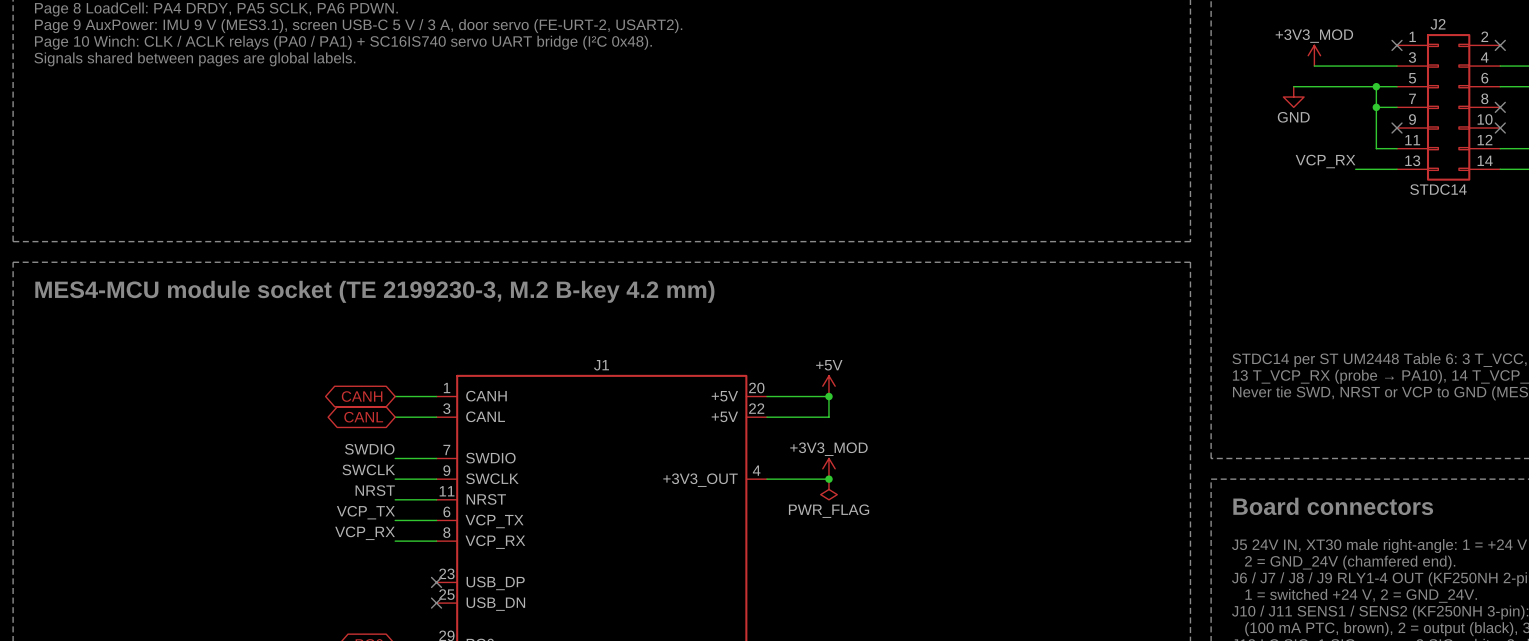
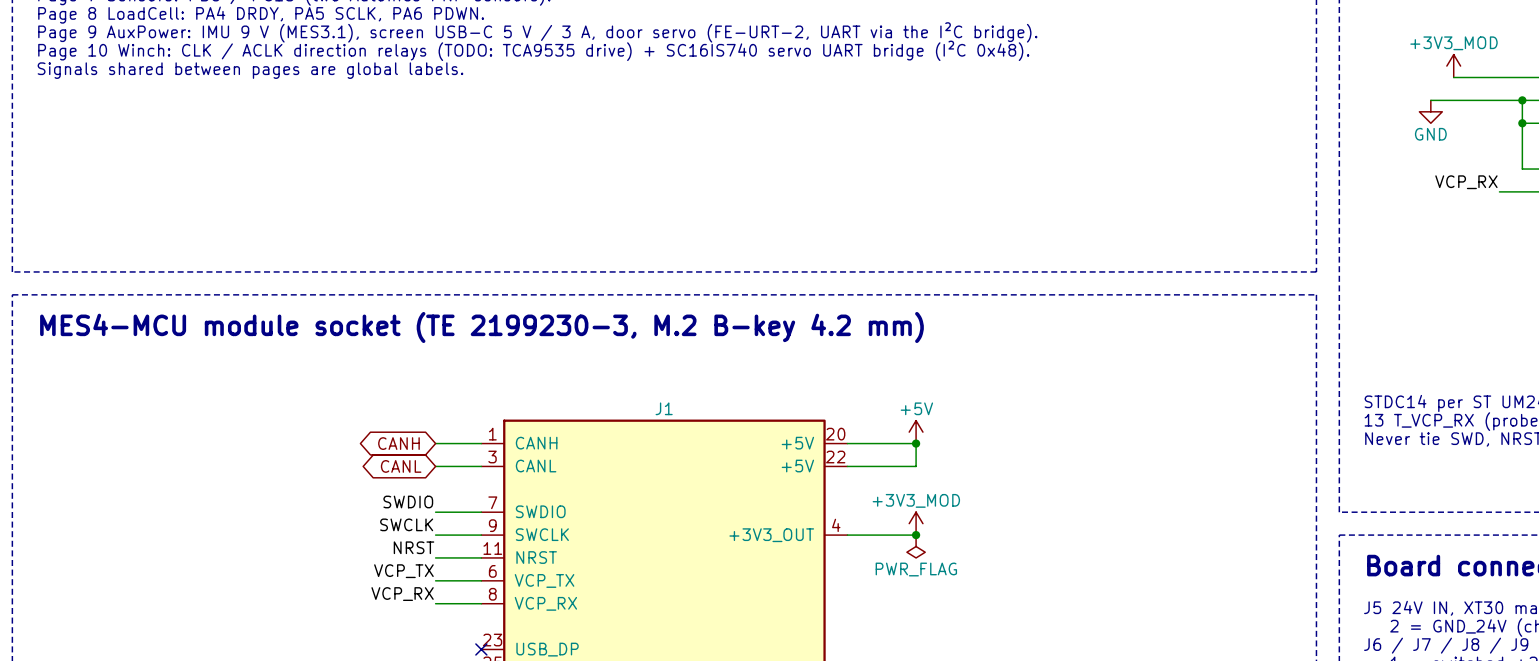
text: Page 9 AuxPower: IMU 9 V (MES3.1), screen USB-C 5 V / 3 A, door servo (FE-URT-2, USART2). (358, 26) -> Page 9 AuxPower: IMU 9 V (MES3.1), screen USB-C 5 V / 3 A, door servo (FE-URT-2, UART via the I²C bridge). (537, 32)
text: Page 10 Winch: CLK / ACLK relays (PA0 / PA1) + SC16IS740 servo UART bridge (I²C 0x48). (343, 42) -> Page 10 Winch: CLK / ACLK direction relays (TODO: TCA9535 drive) + SC16IS740 servo UART bridge (I²C 0x48). (533, 50)

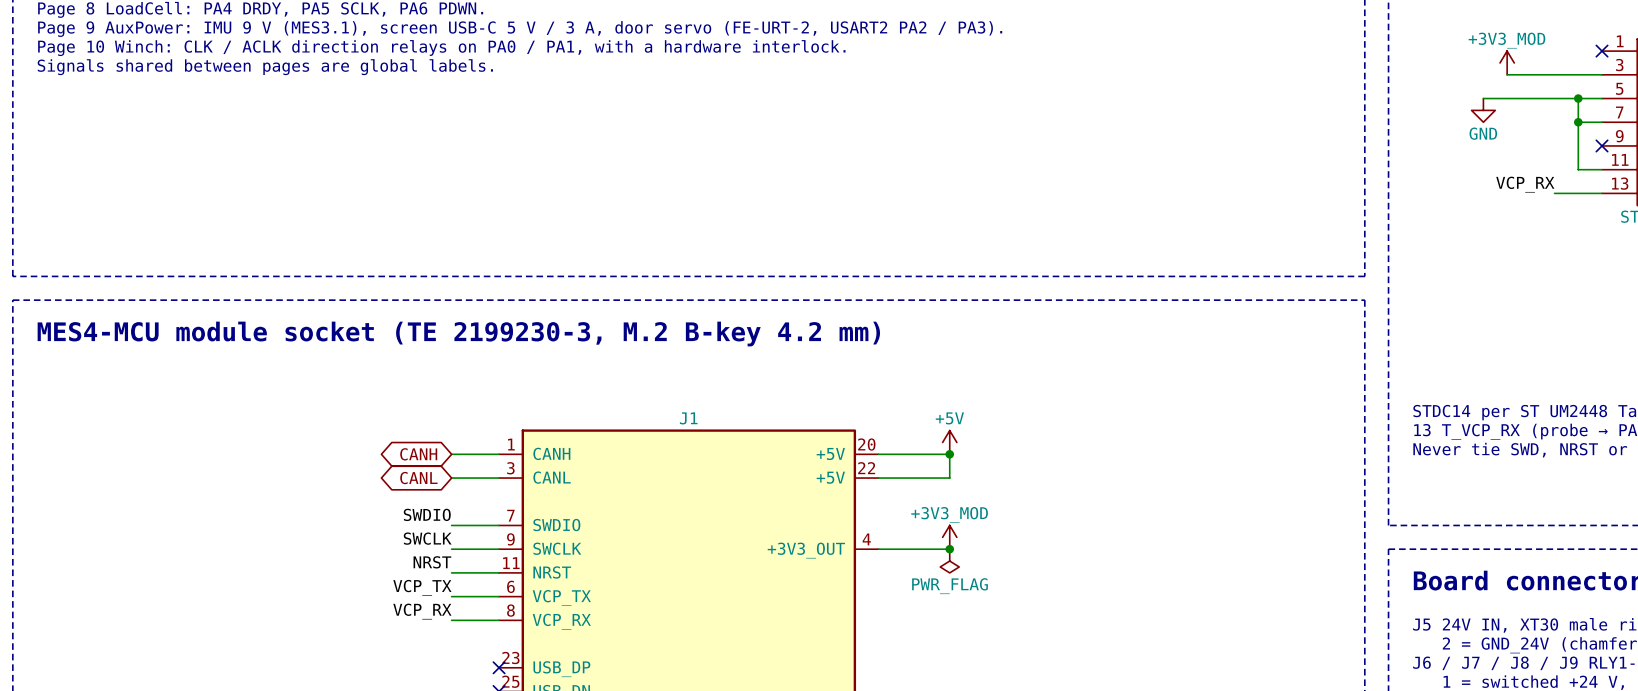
text: Page 9 AuxPower: IMU 9 V (MES3.1), screen USB-C 5 V / 3 A, door servo (FE-URT-2, UART via the I²C bridge). (537, 32) -> Page 9 AuxPower: IMU 9 V (MES3.1), screen USB-C 5 V / 3 A, door servo (FE-URT-2, USART2 PA2 / PA3). (520, 29)
text: Page 10 Winch: CLK / ACLK direction relays (TODO: TCA9535 drive) + SC16IS740 servo UART bridge (I²C 0x48). (533, 50) -> Page 10 Winch: CLK / ACLK direction relays on PA0 / PA1, with a hardware interlock. (441, 48)

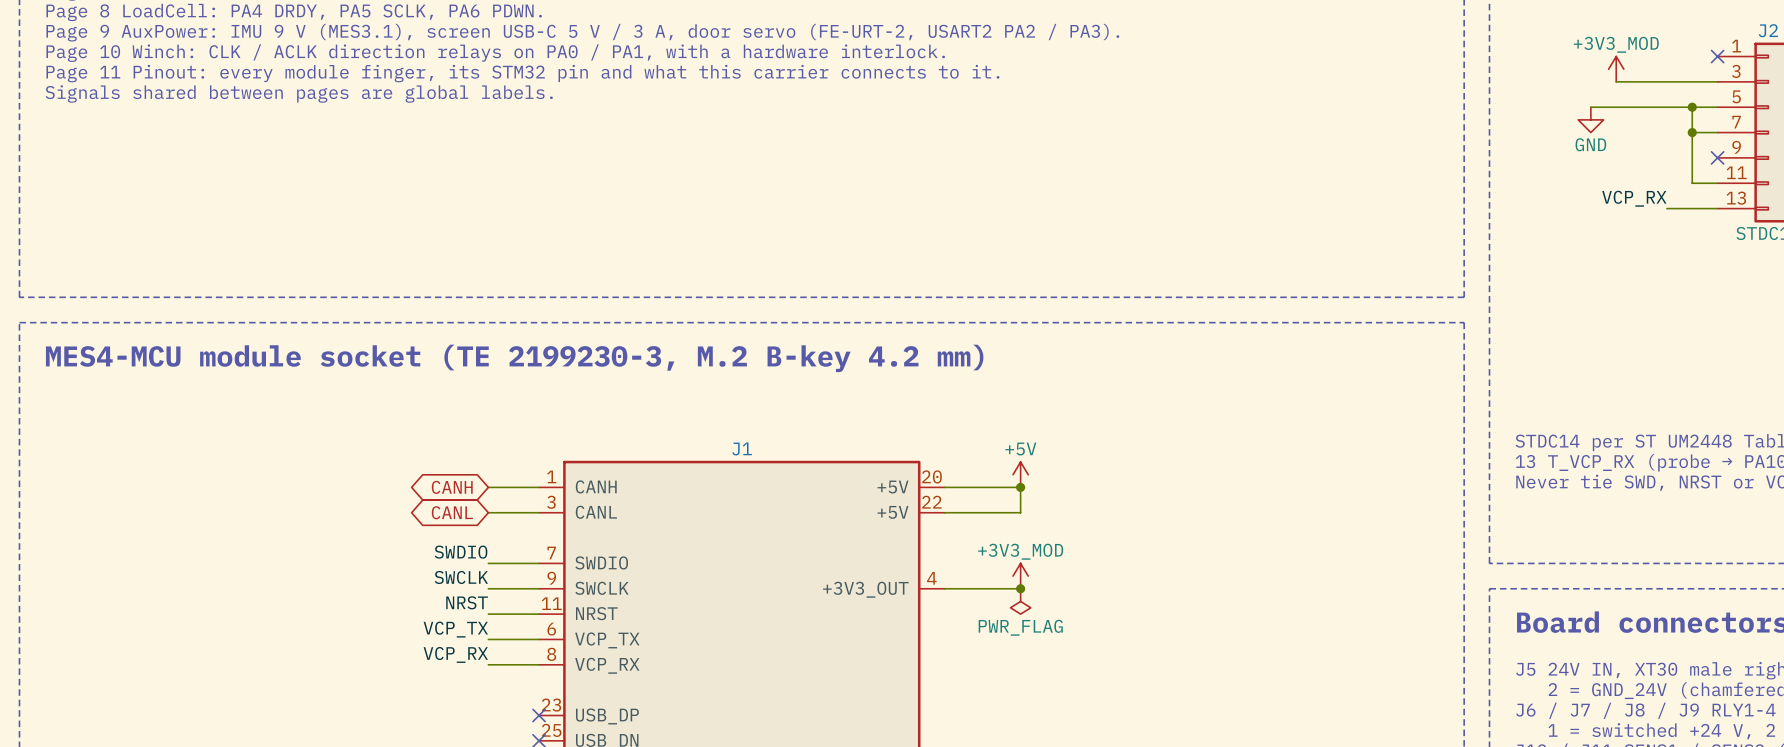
text: Signals shared between pages are global labels. (265, 67) -> Page 11 Pinout: every module finger, its STM32 pin and what this carrier connects to it. (522, 73)
text: none -> Signals shared between pages are global labels. (299, 94)

